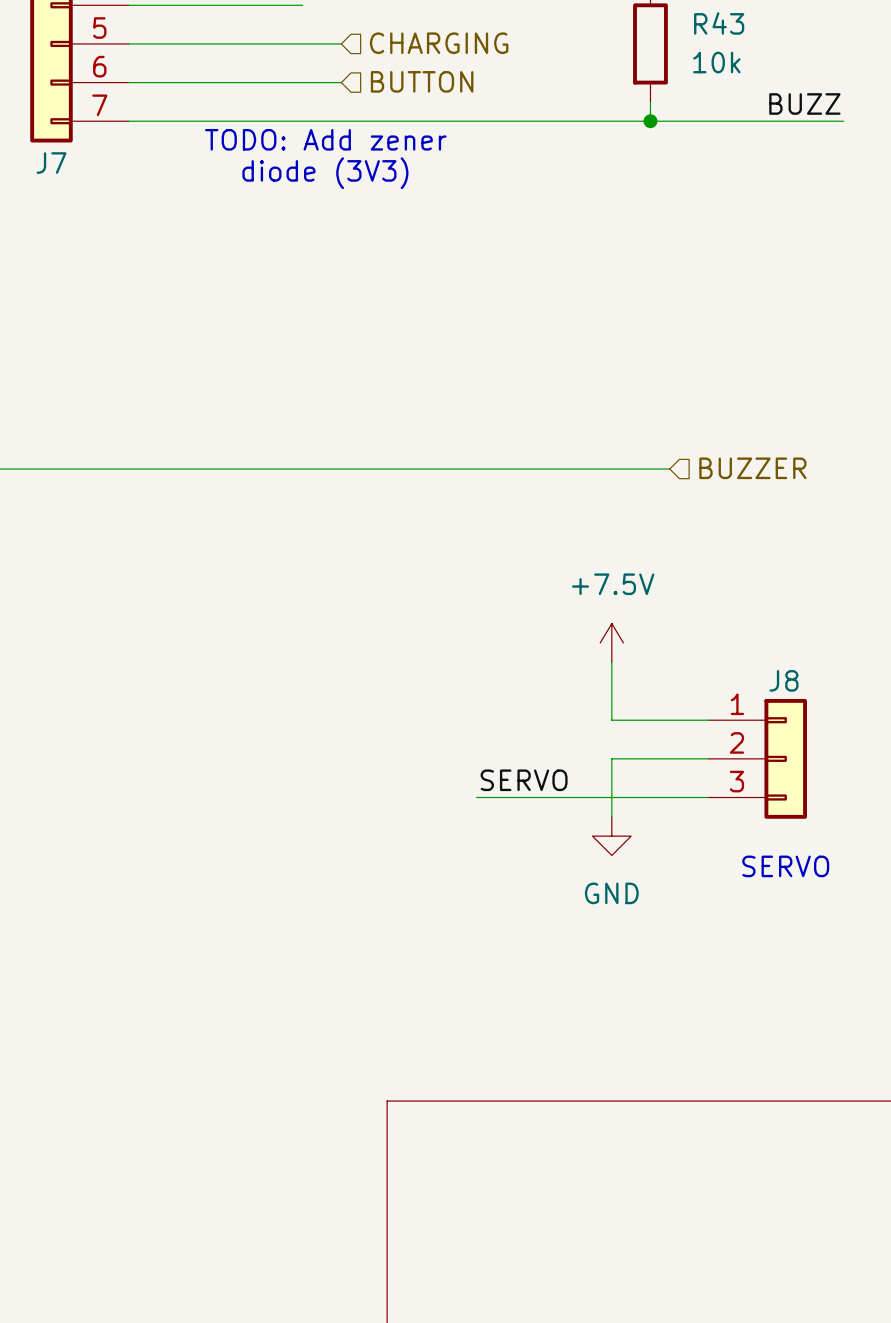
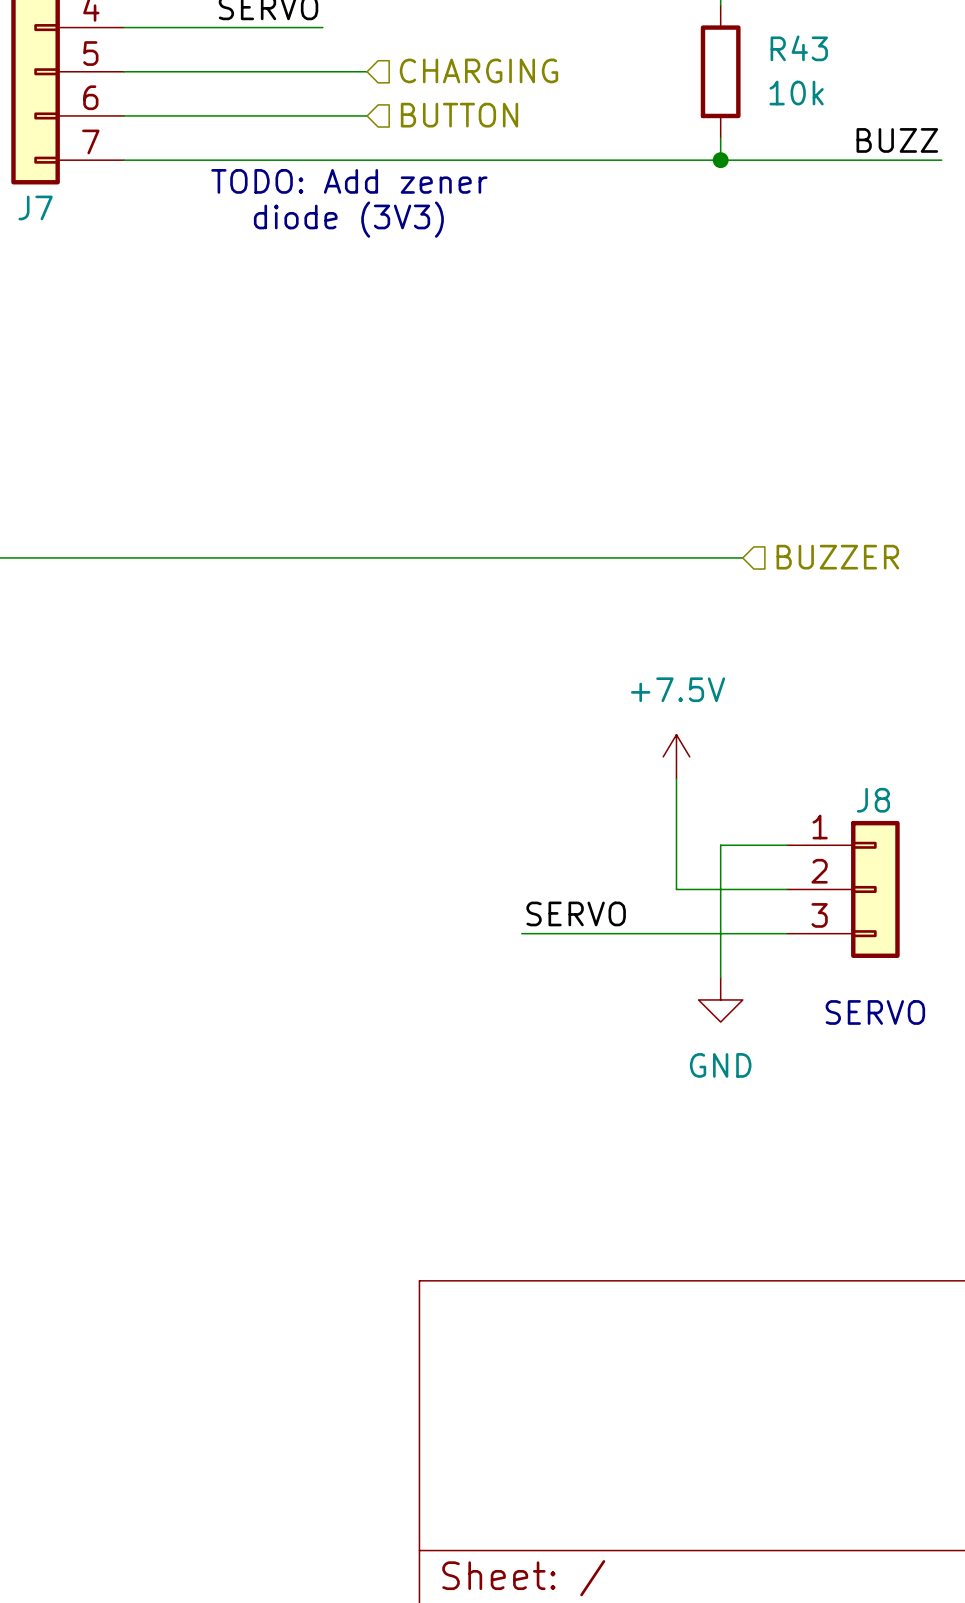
wire: (611, 720) (650, 720) -> (676, 845) (676, 889)
wire: none -> (720, 845) (720, 977)
wire: (611, 758) (611, 816) -> none
power symbol position: GND (611, 836) -> GND (720, 999)

